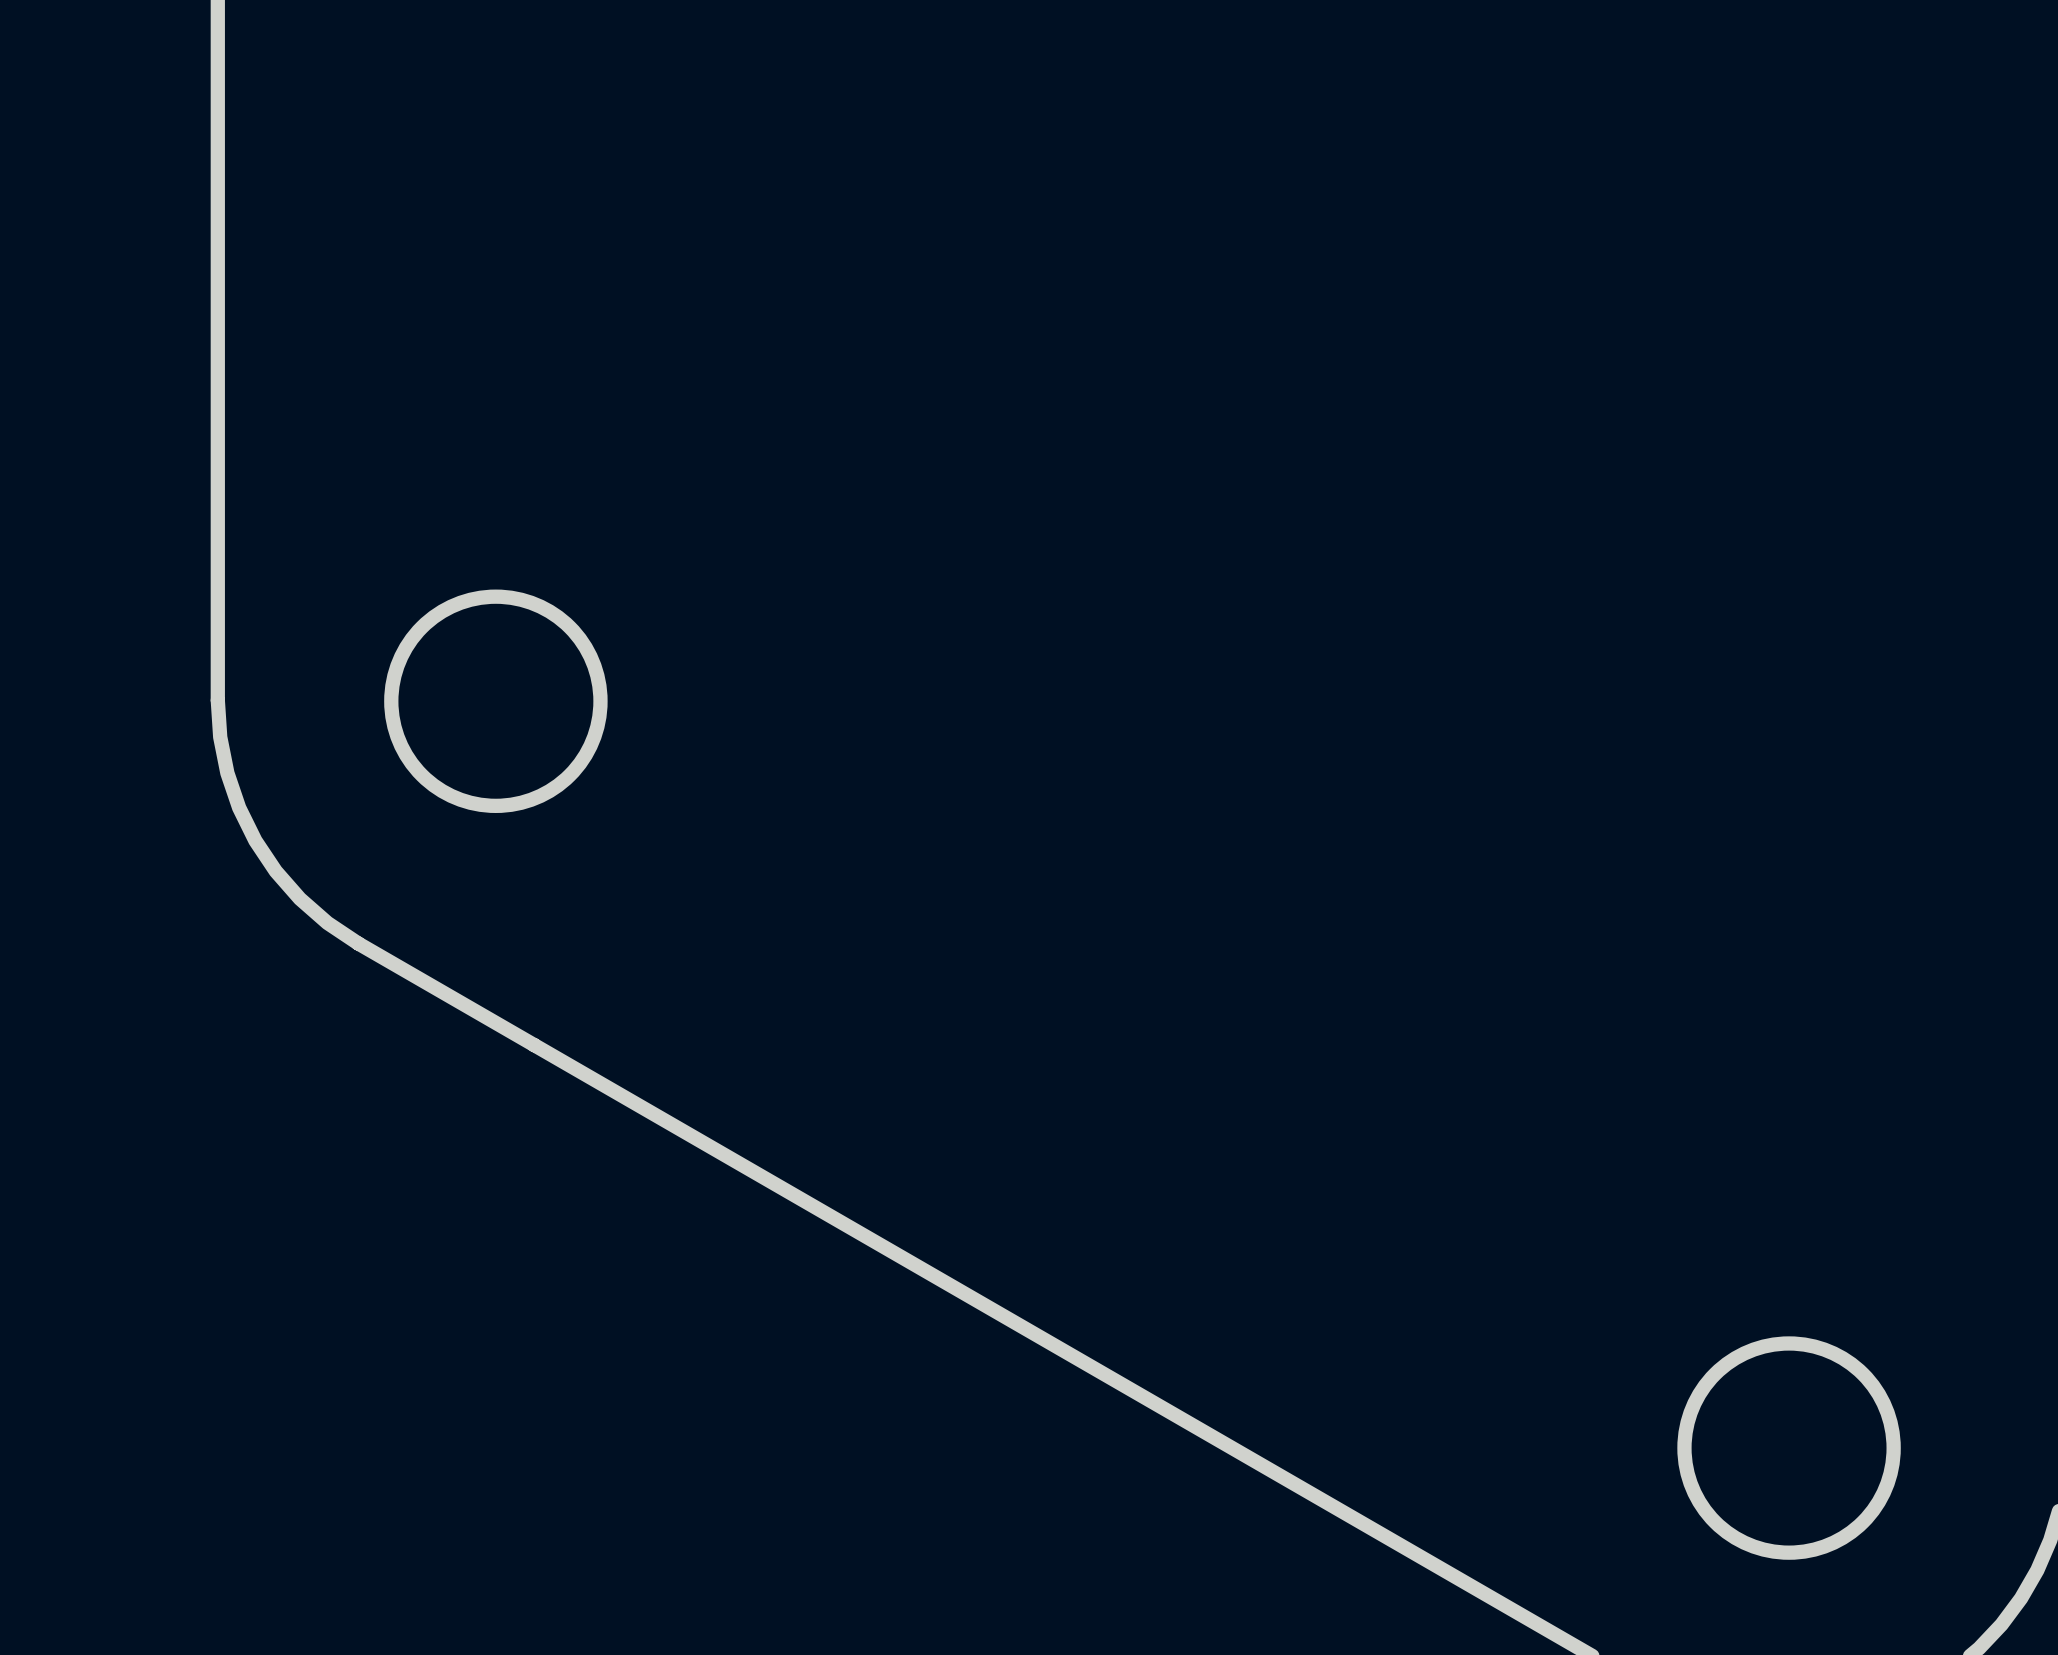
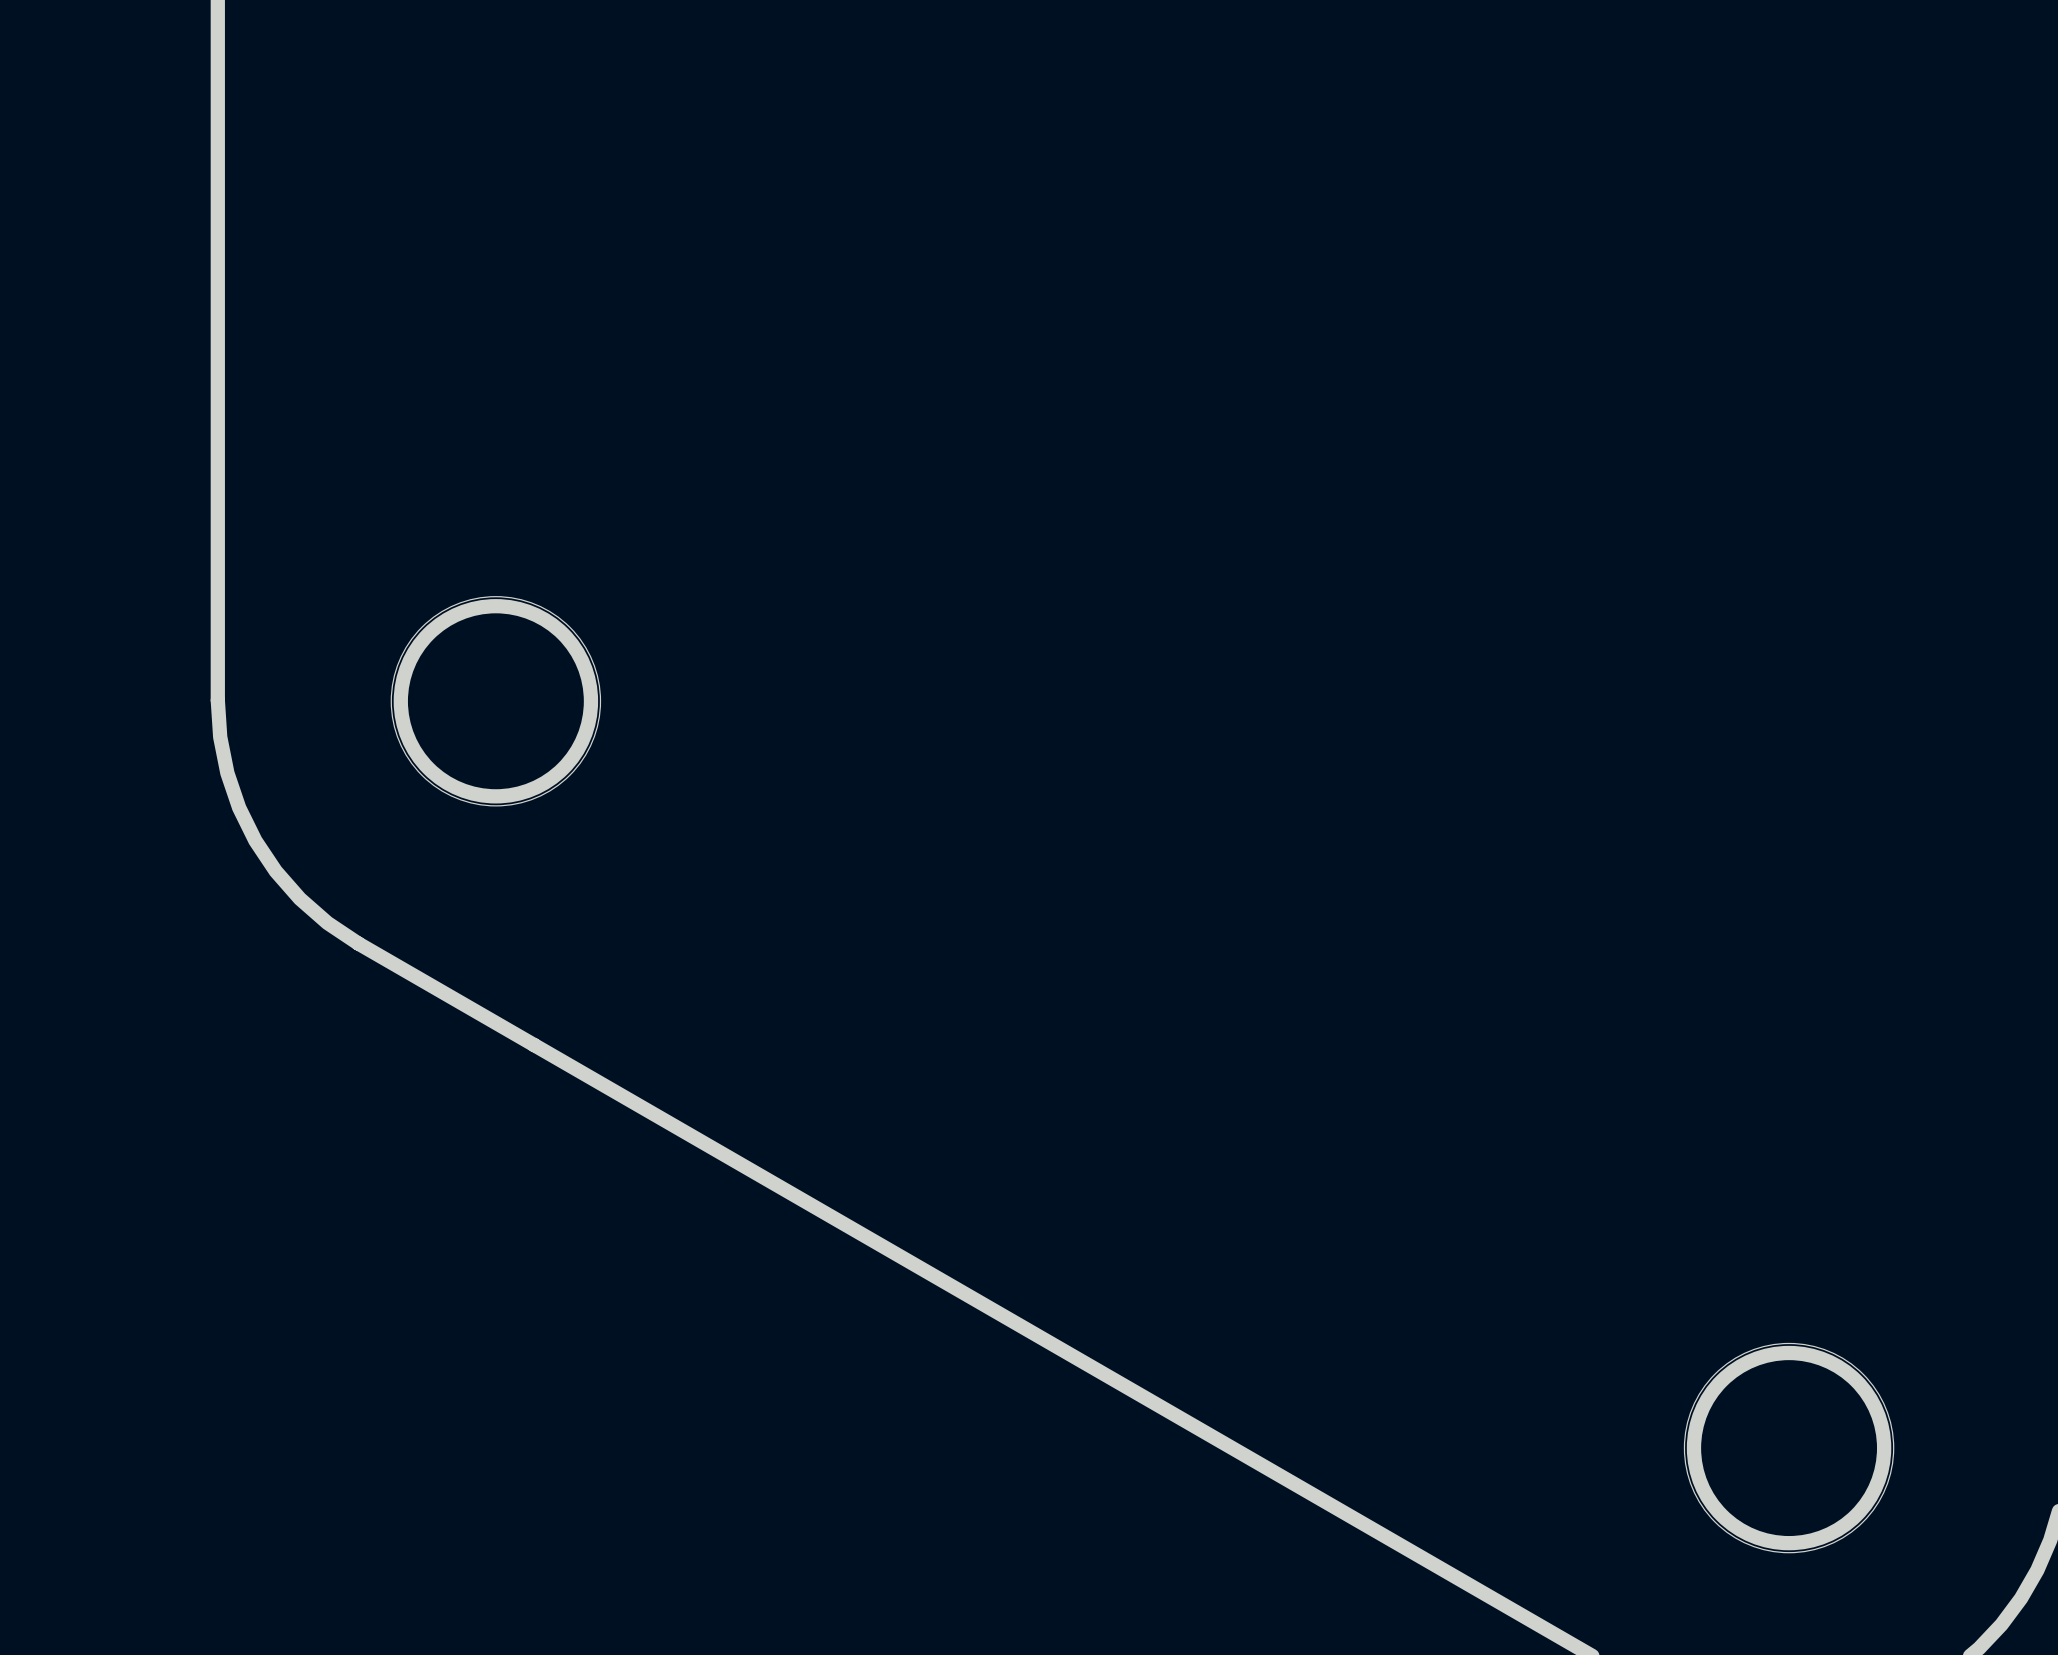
round board edge size: [384, 589, 608, 813] -> [393, 599, 599, 804]
round board edge size: [1677, 1336, 1901, 1560] -> [1686, 1345, 1892, 1551]

